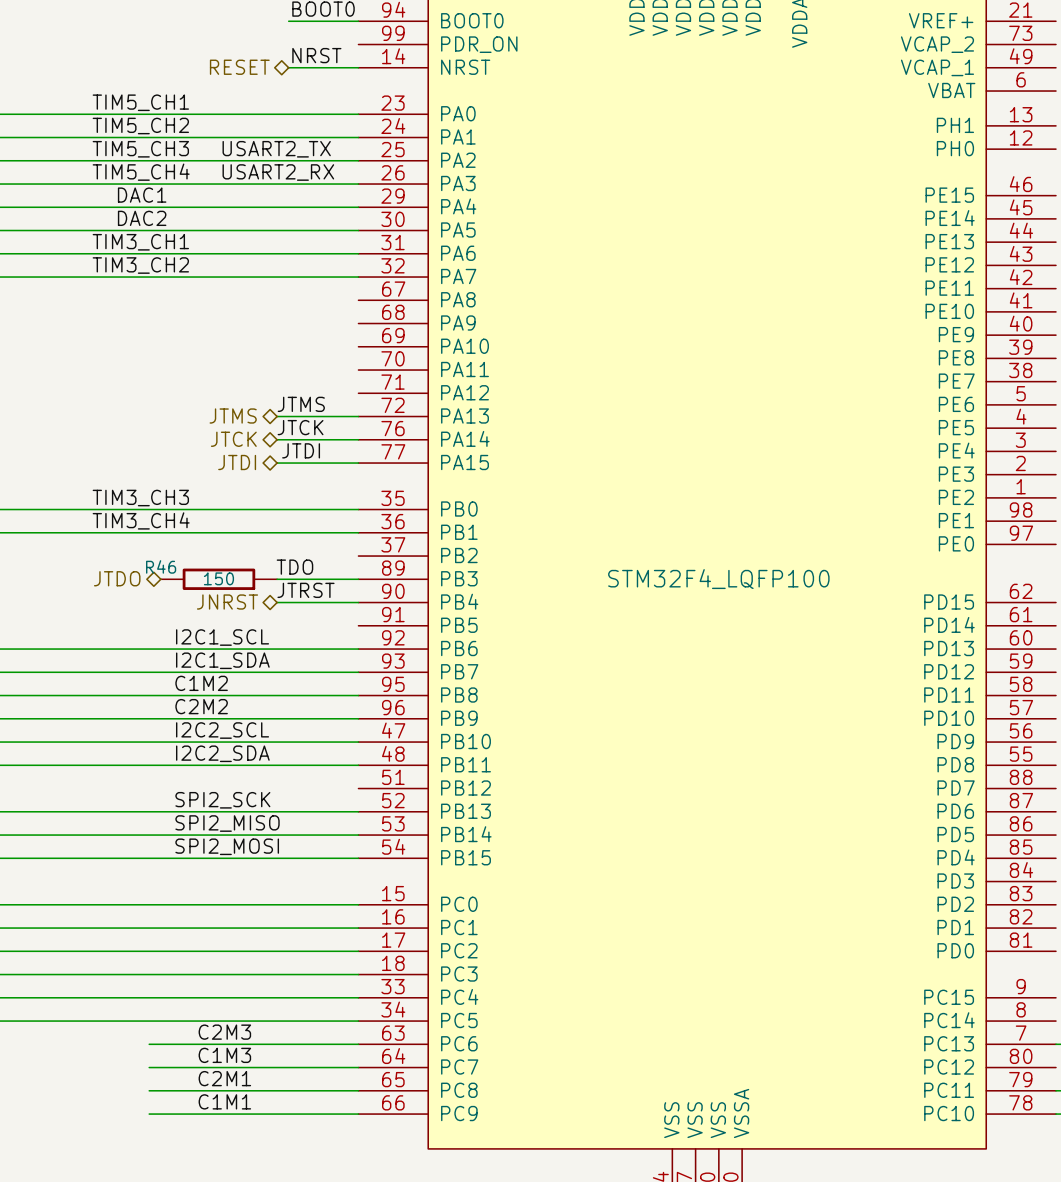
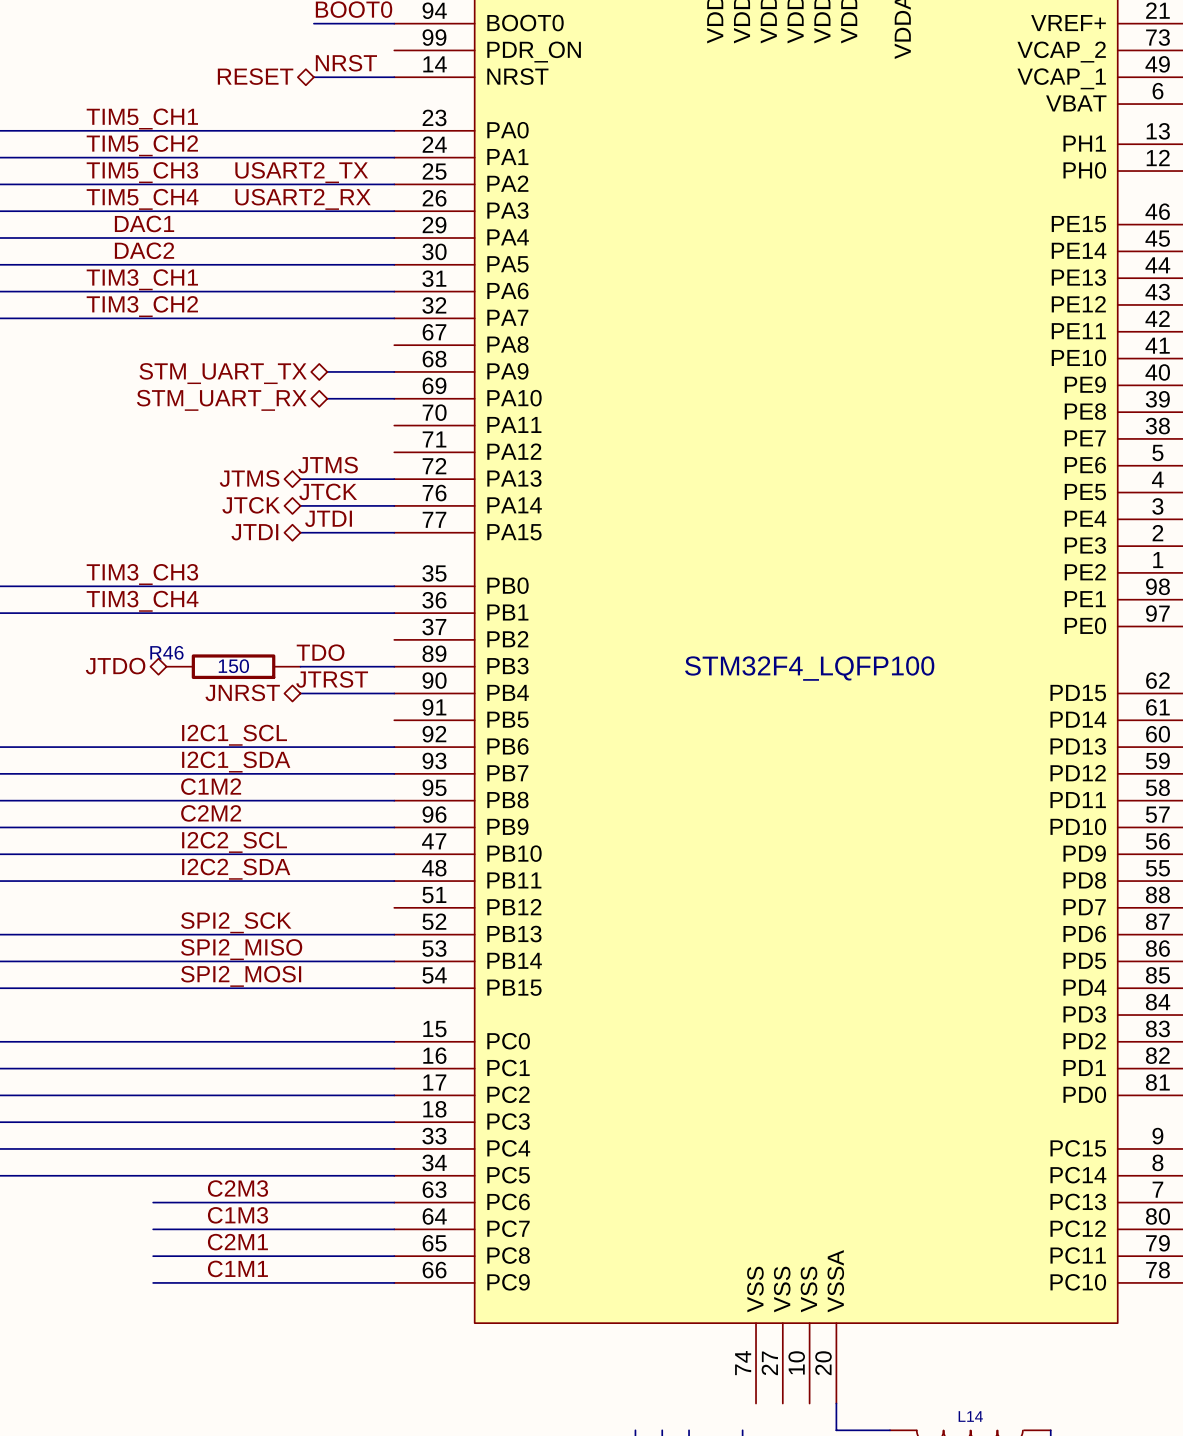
hierarchical label: none -> STM_UART_TX (223, 373)
wire: none -> (327, 371) (394, 371)
hierarchical label: none -> STM_UART_RX (221, 400)
wire: none -> (327, 398) (394, 398)

